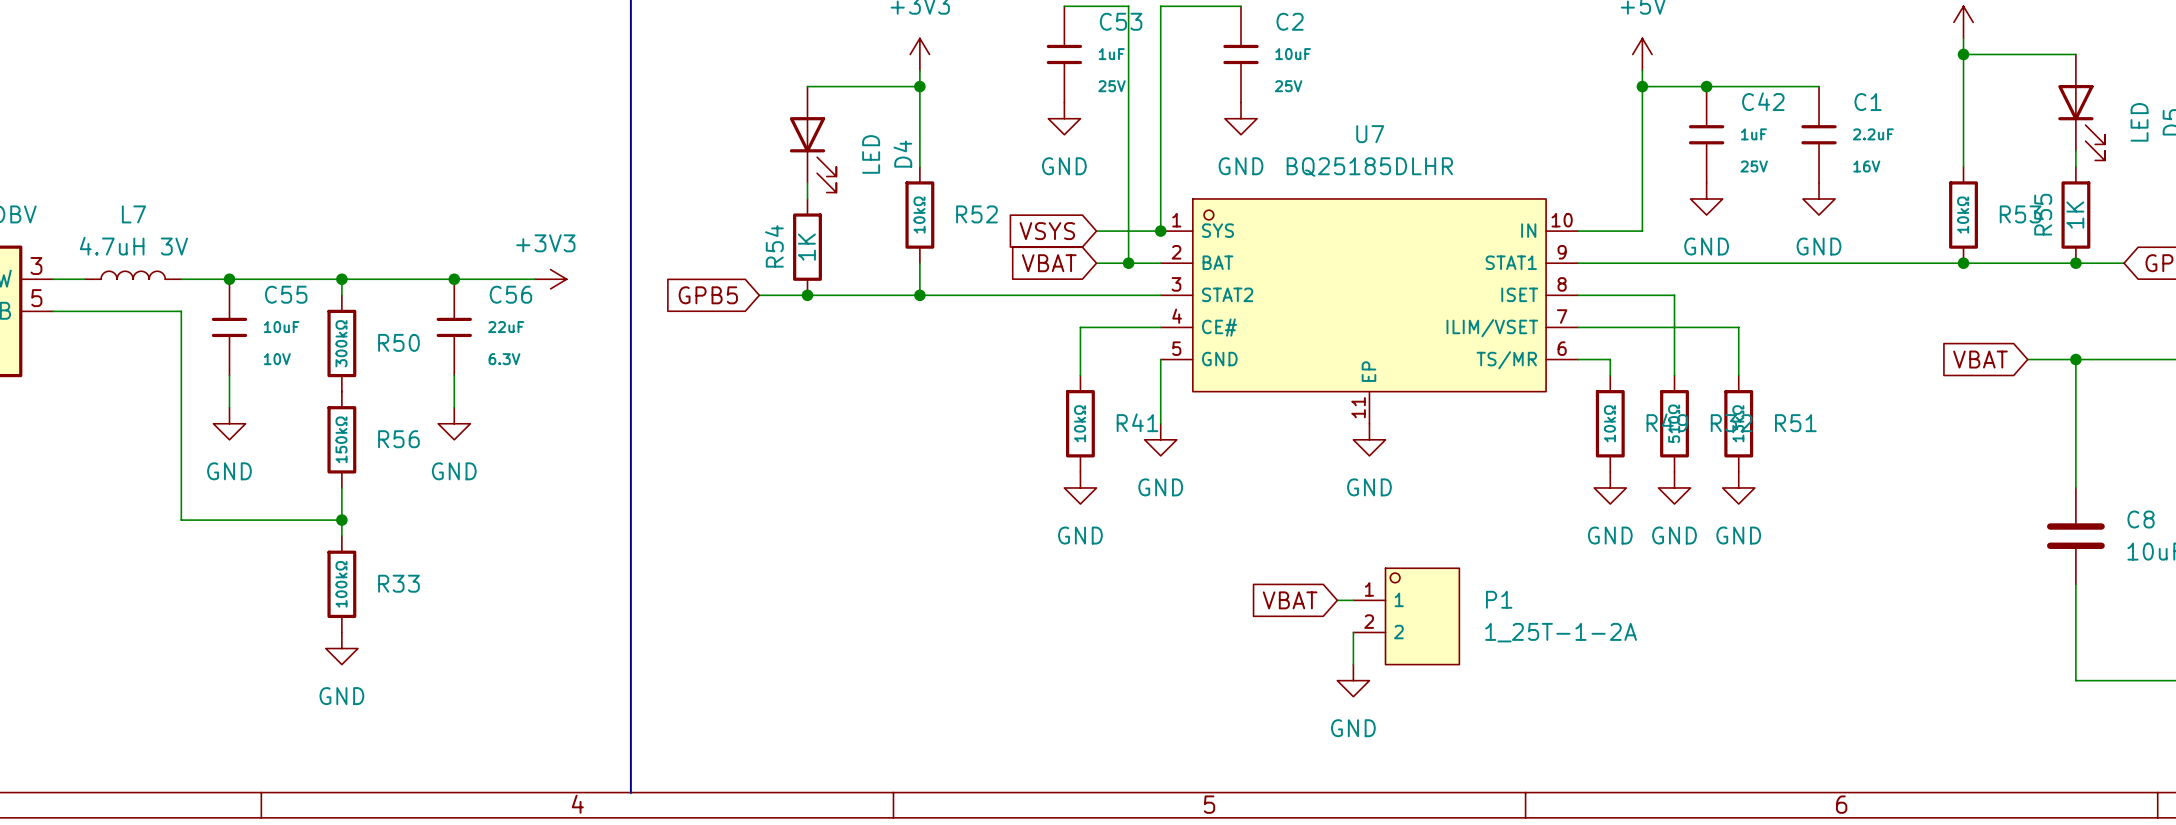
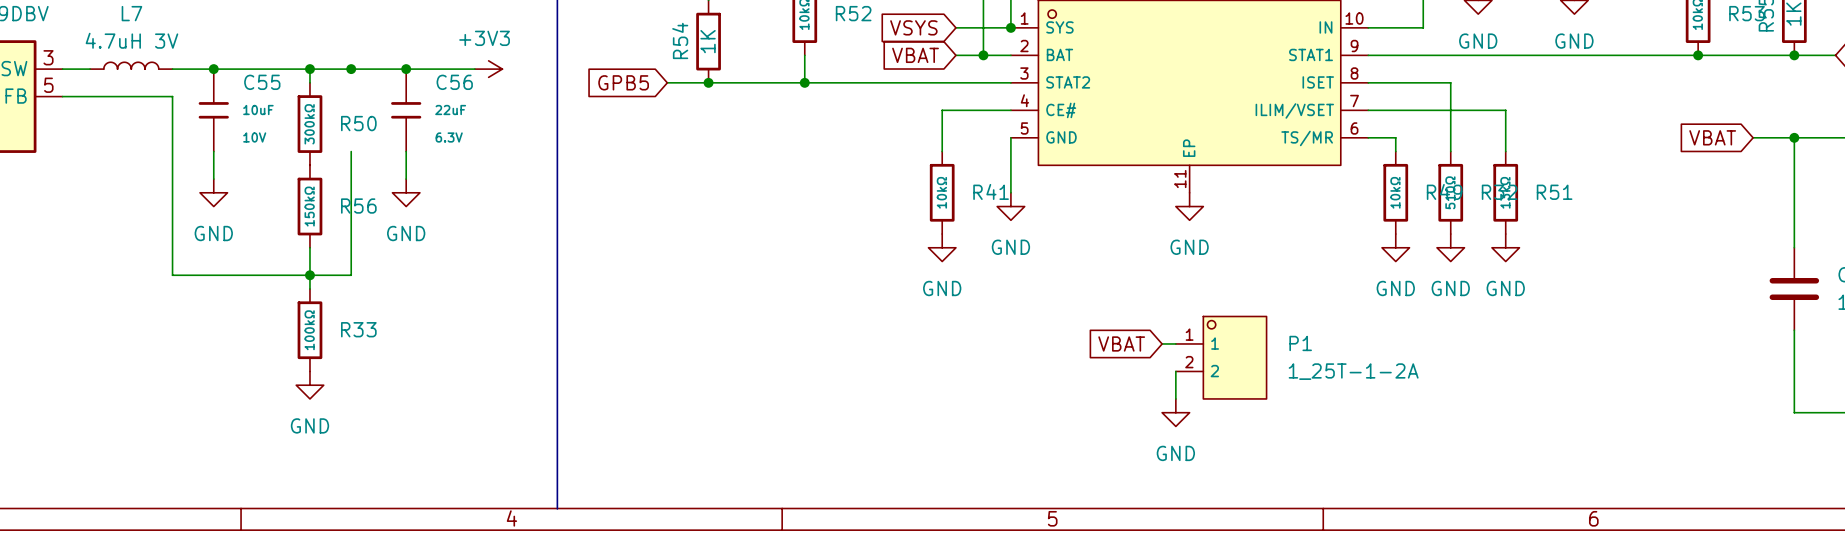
junction: none -> (351, 69)
wire: none -> (351, 151) (351, 275) (309, 275)

